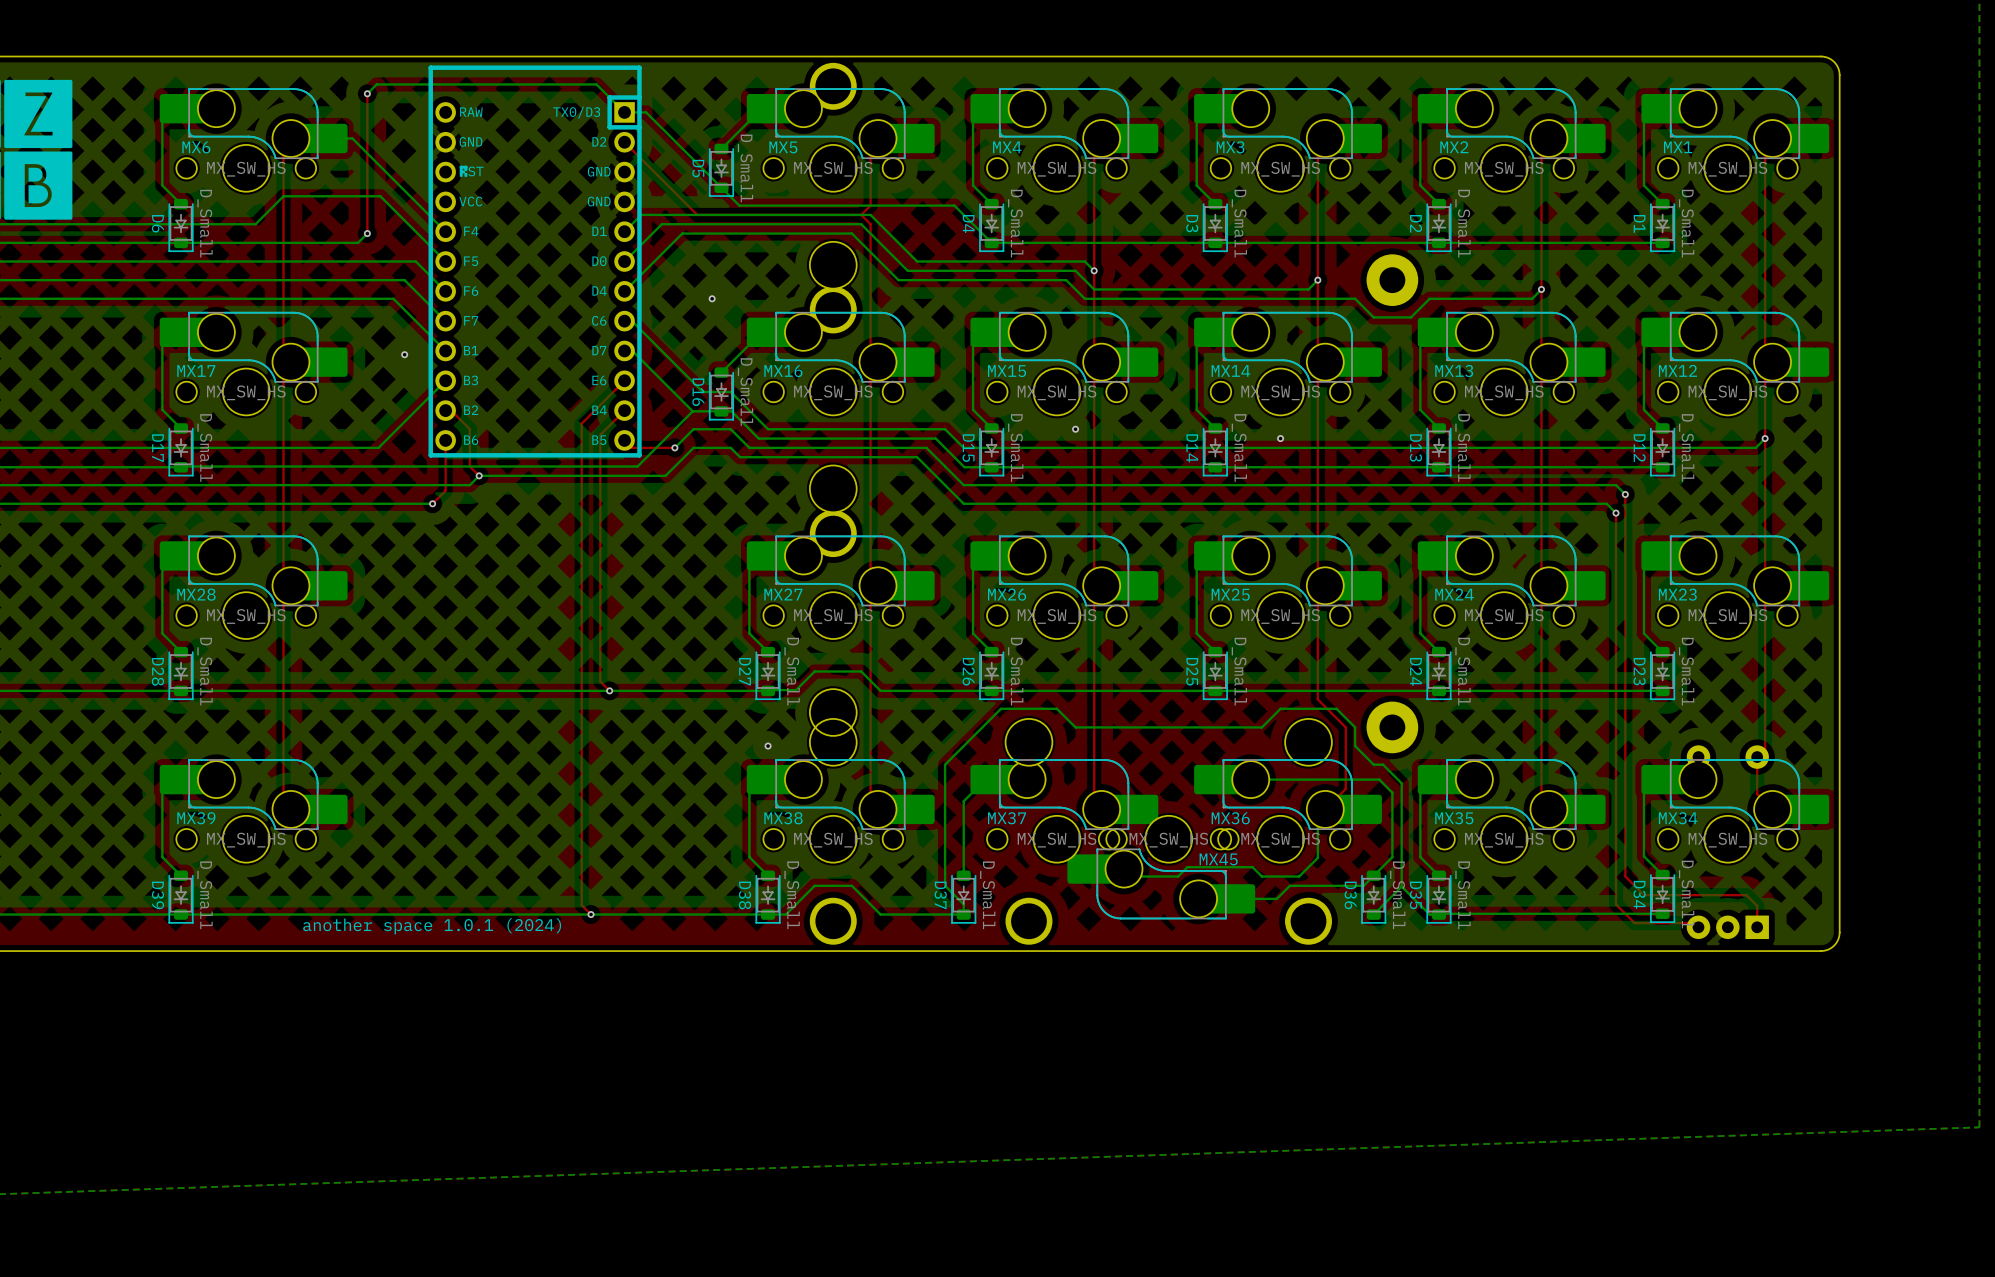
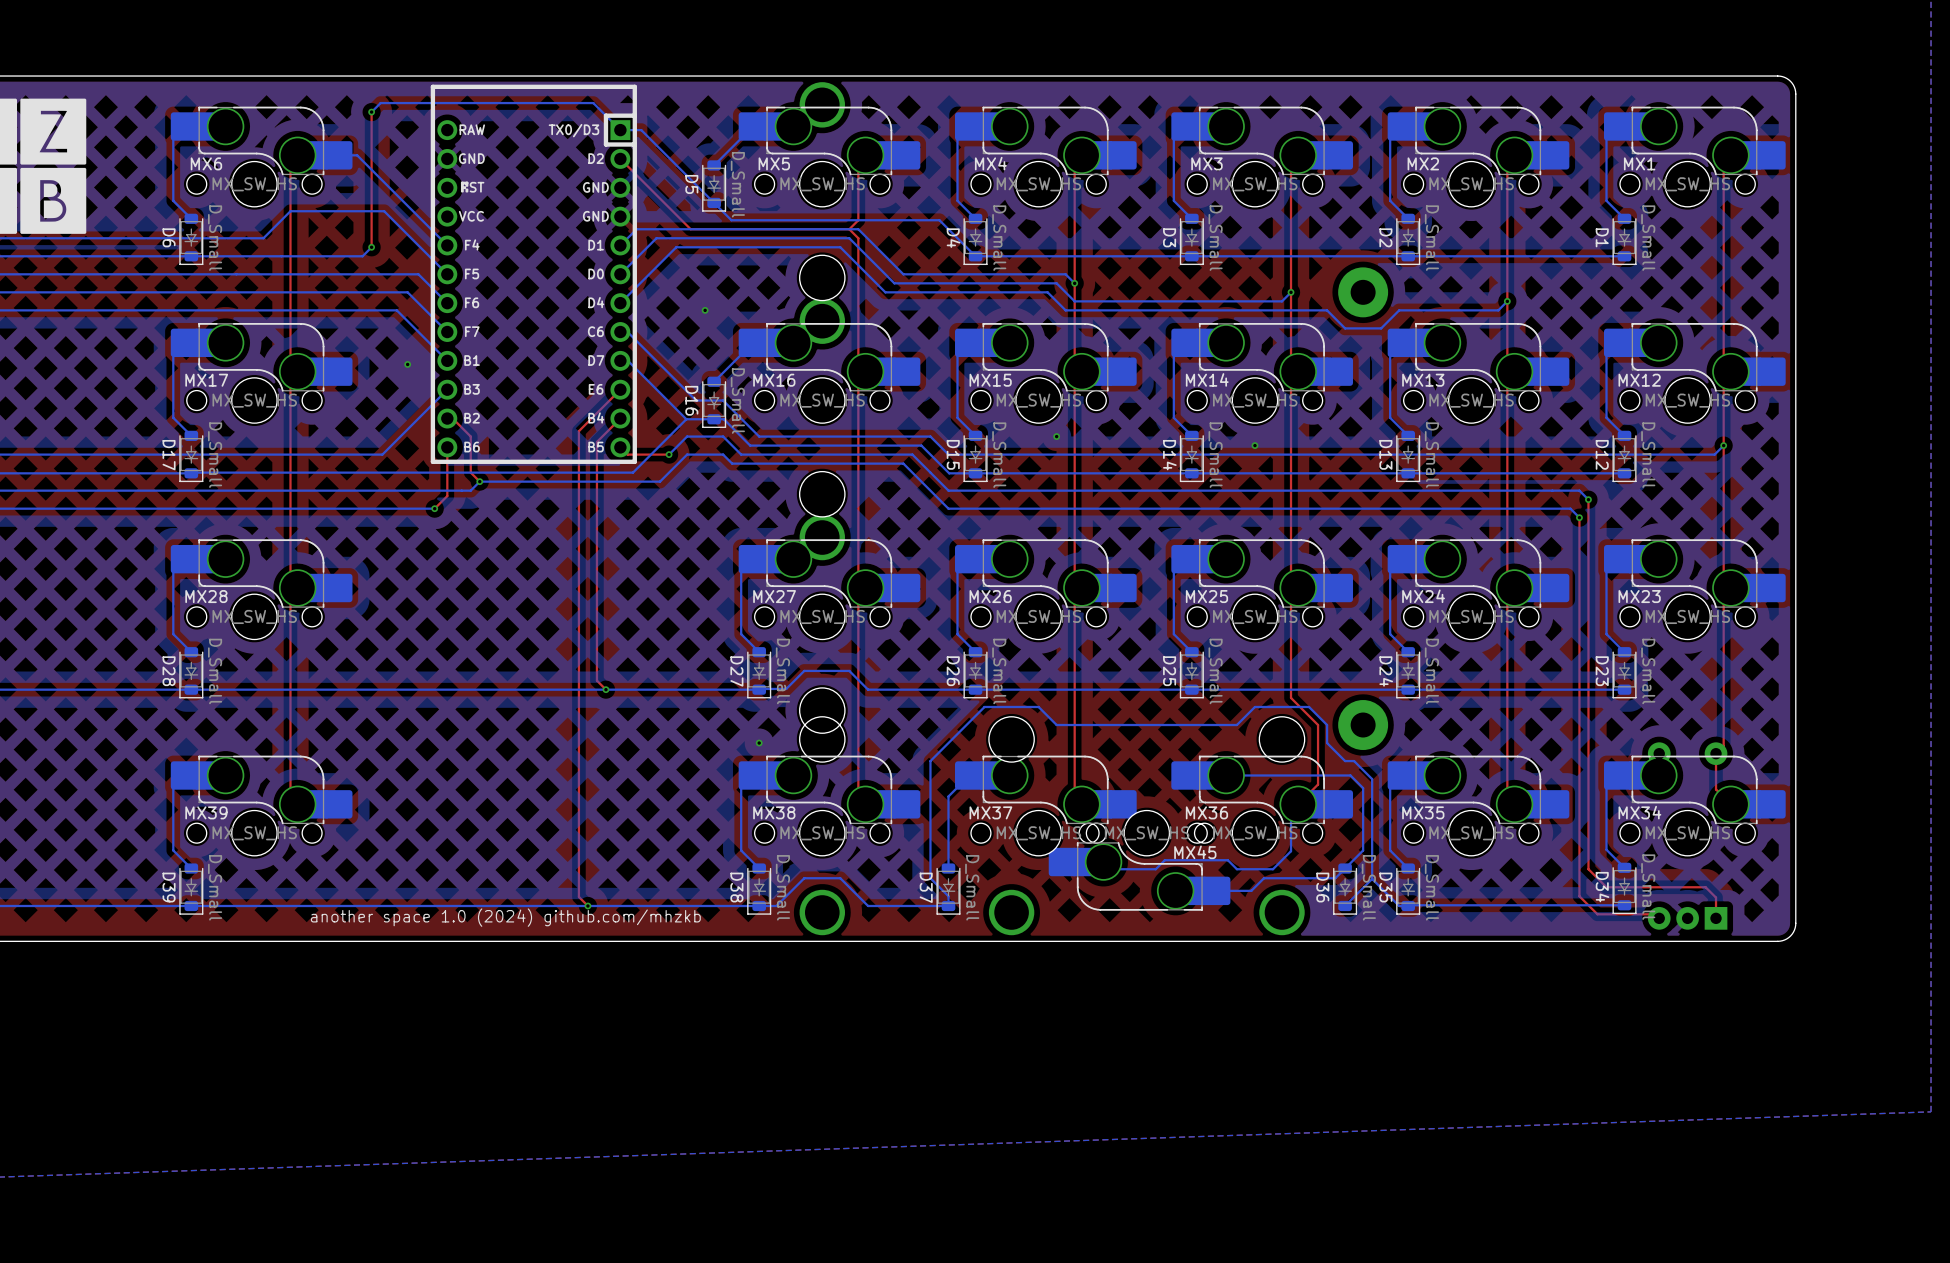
text: another space 1.0.1 (2024) (432, 926) -> another space 1.0 (2024) github.com/mhzkb (505, 917)

